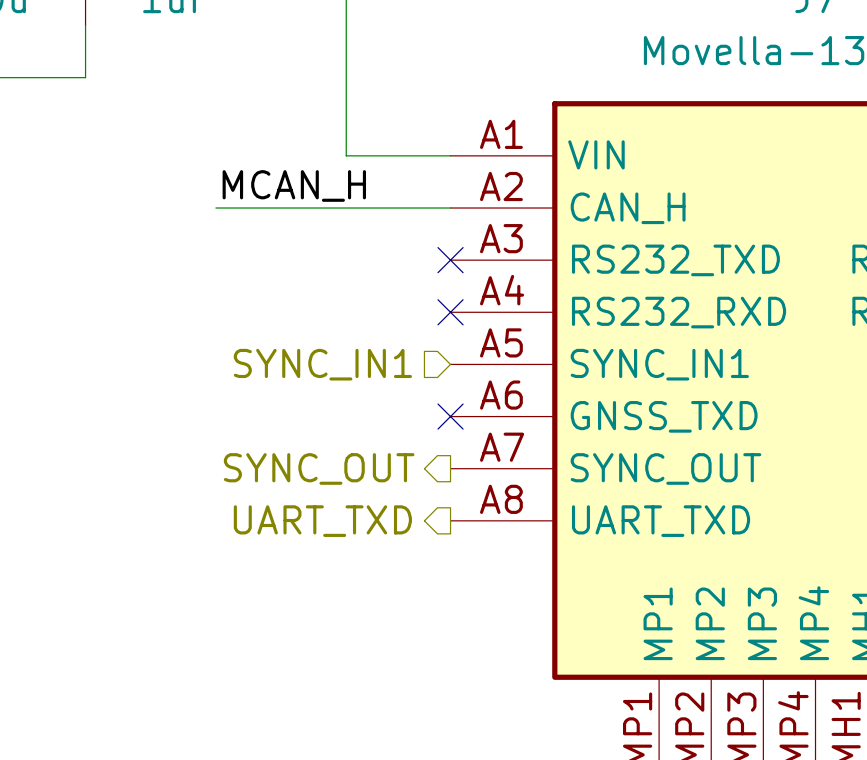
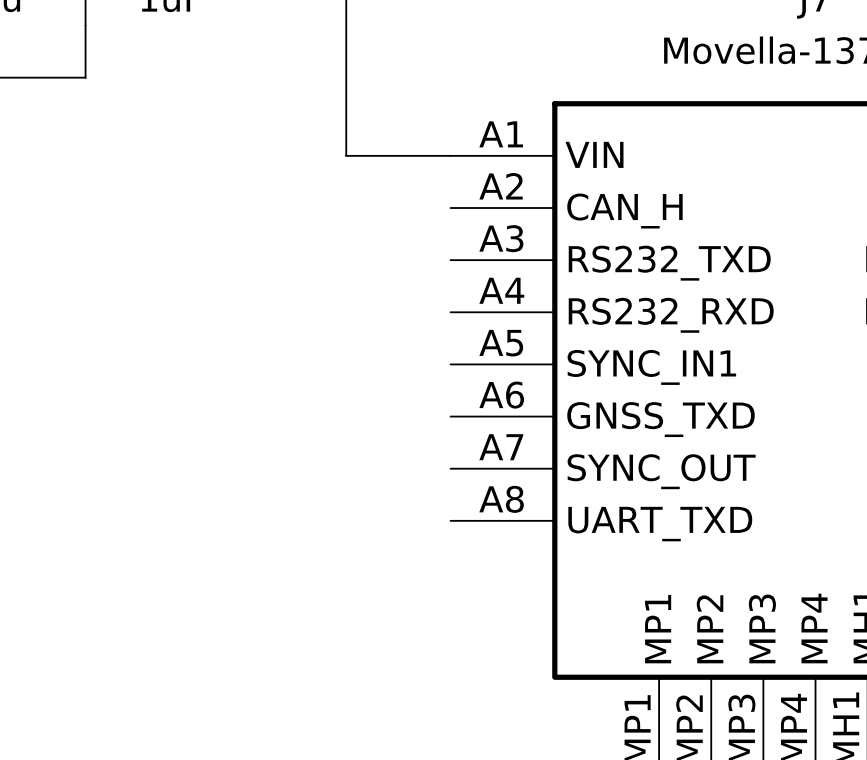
label: MCAN_H (294, 185) -> none
wire: (215, 208) (450, 208) -> none
no-connect mark: (450, 260) -> none
no-connect mark: (450, 312) -> none
hierarchical label: SYNC_IN1 (322, 364) -> none
no-connect mark: (450, 416) -> none
hierarchical label: SYNC_OUT (319, 468) -> none
hierarchical label: UART_TXD (322, 521) -> none

